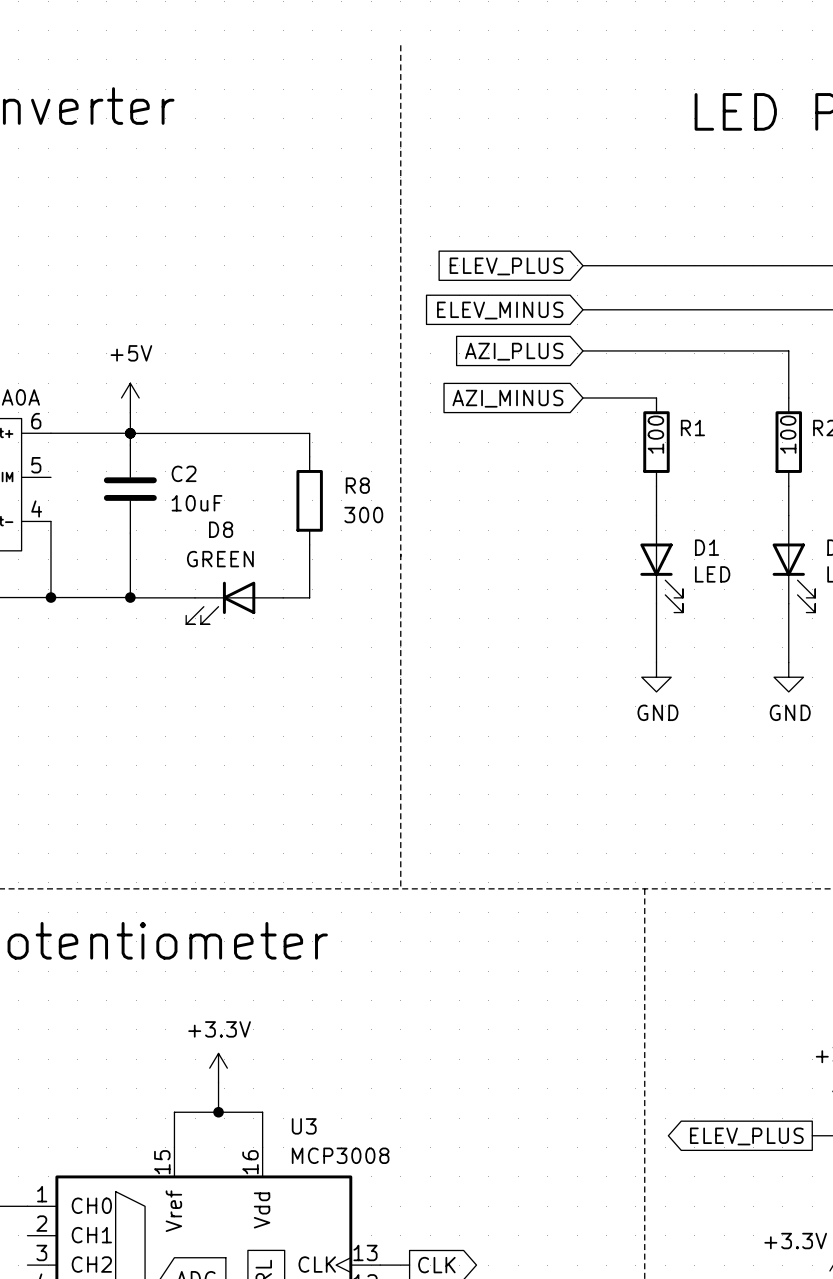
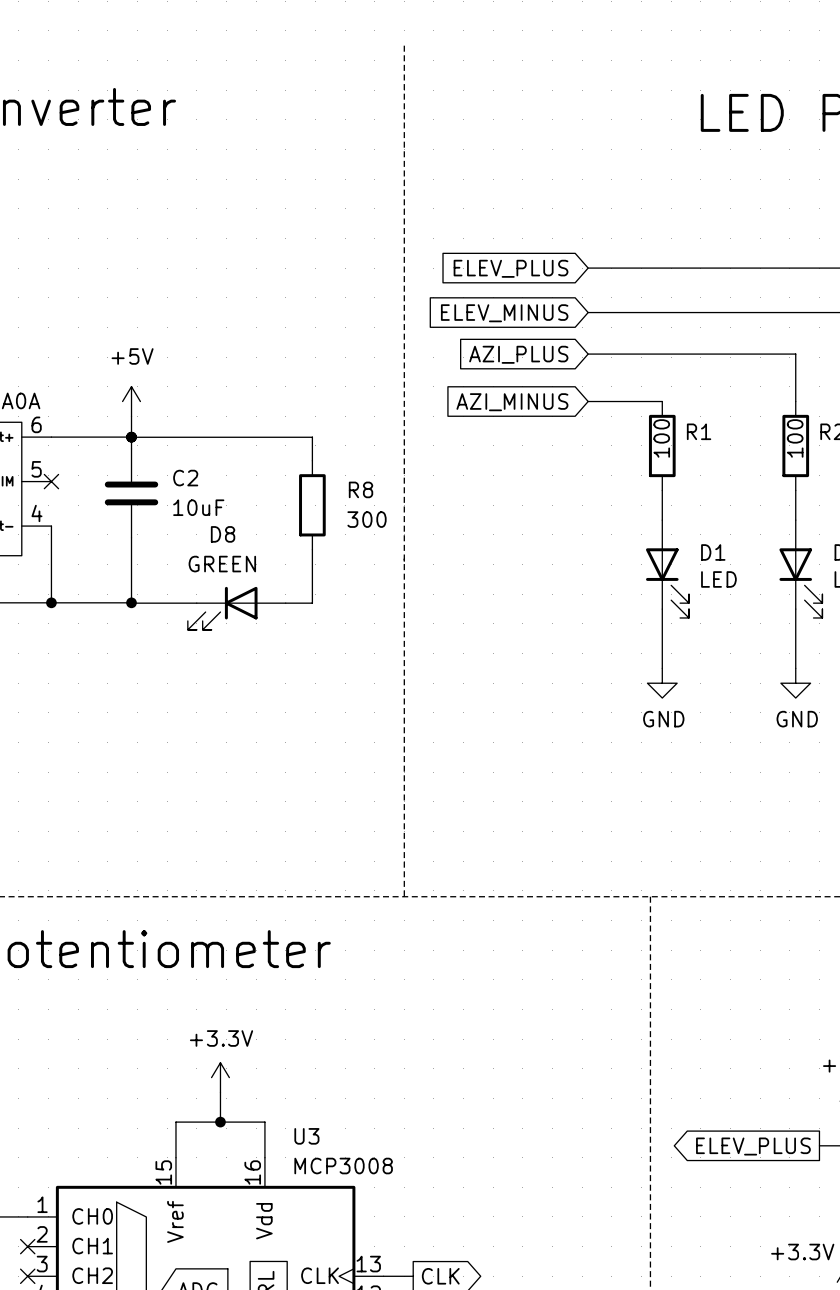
no-connect mark: none -> (51, 481)
no-connect mark: none -> (27, 1246)
no-connect mark: none -> (27, 1276)

